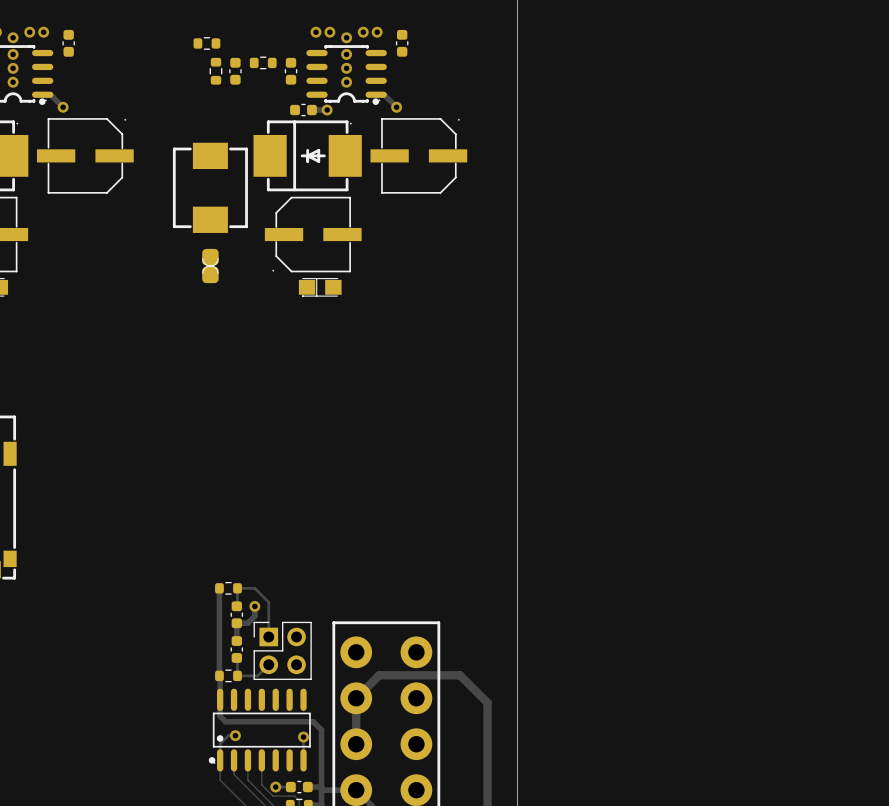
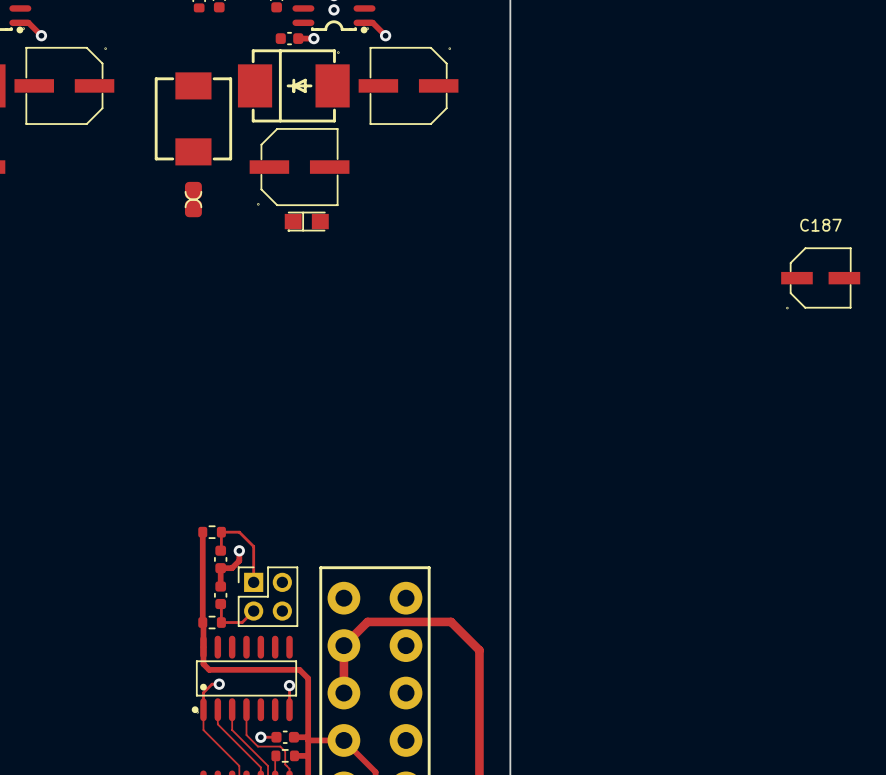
C187: none -> (820, 278)

